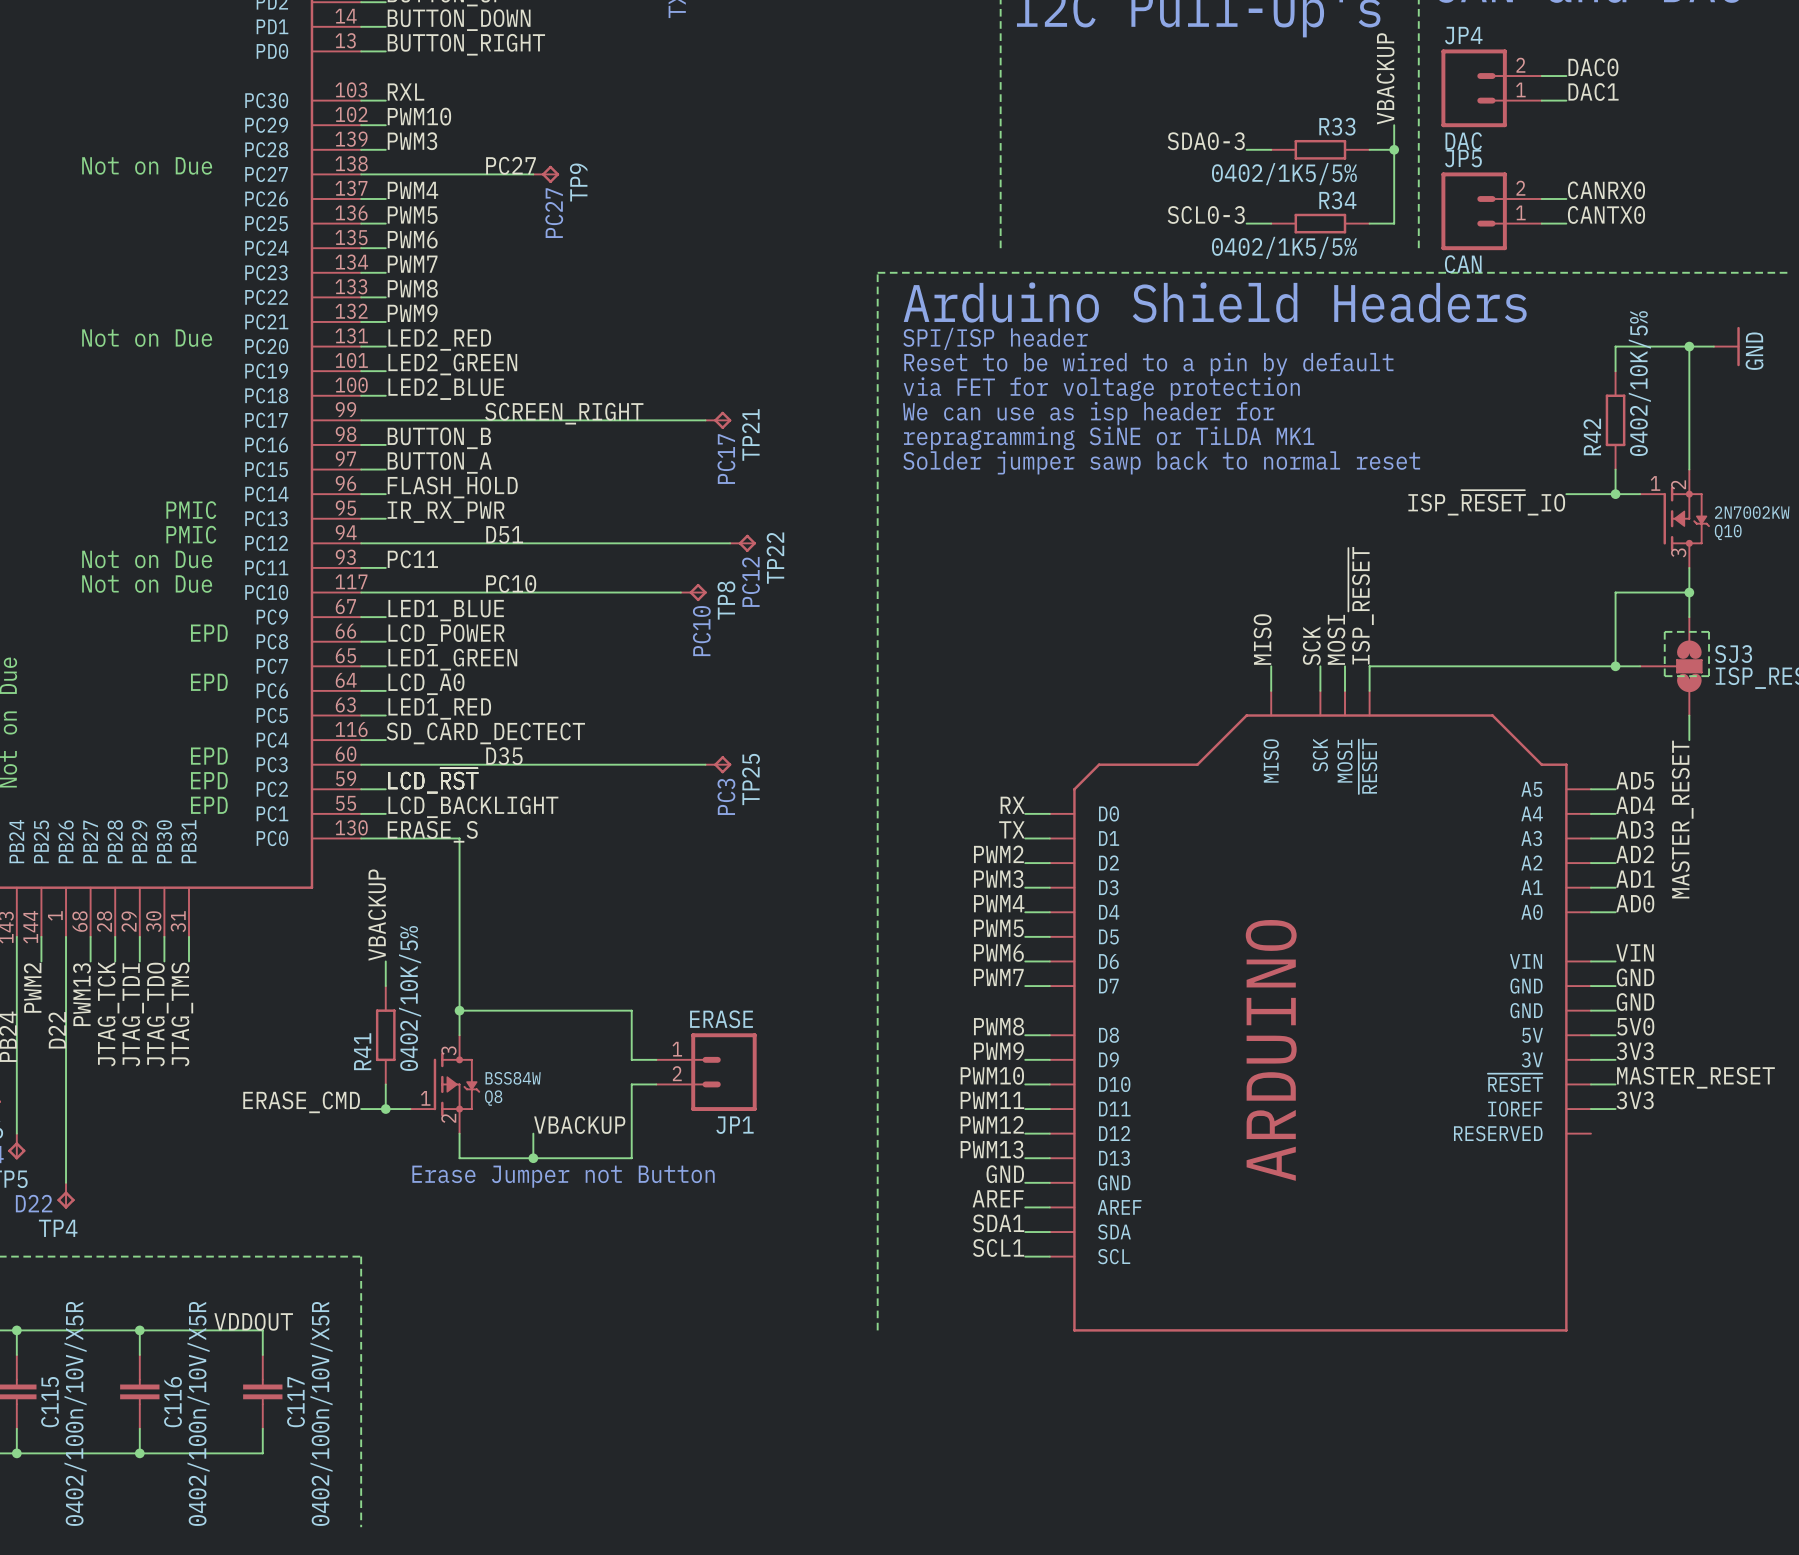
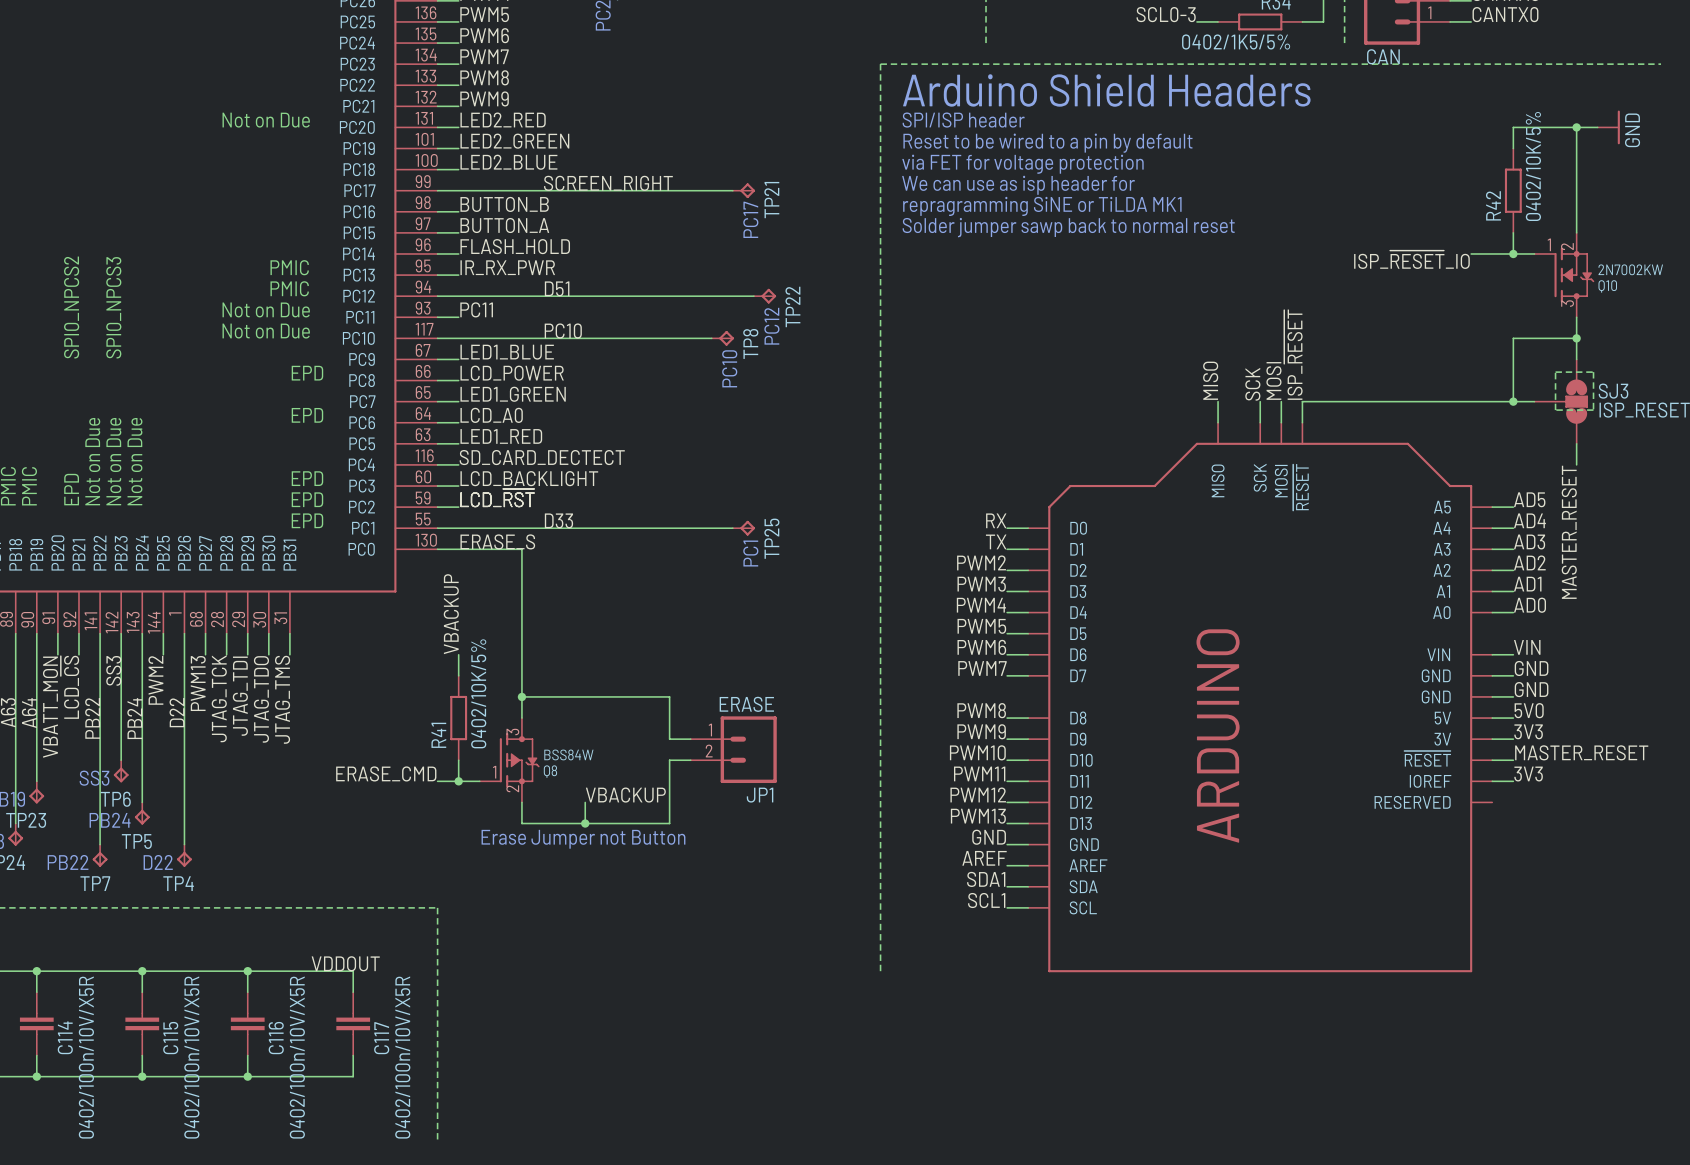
label: D35 (504, 756) -> none
wire: (385, 764) (705, 764) -> (458, 528) (732, 528)
TP25 position: (718, 764) -> (743, 528)
TP25 value: PC3 (726, 796) -> PC1 (750, 553)
label: none -> D33 (558, 520)
label position: LCD_BACKLIGHT (473, 807) -> LCD_BACKLIGHT (529, 478)

